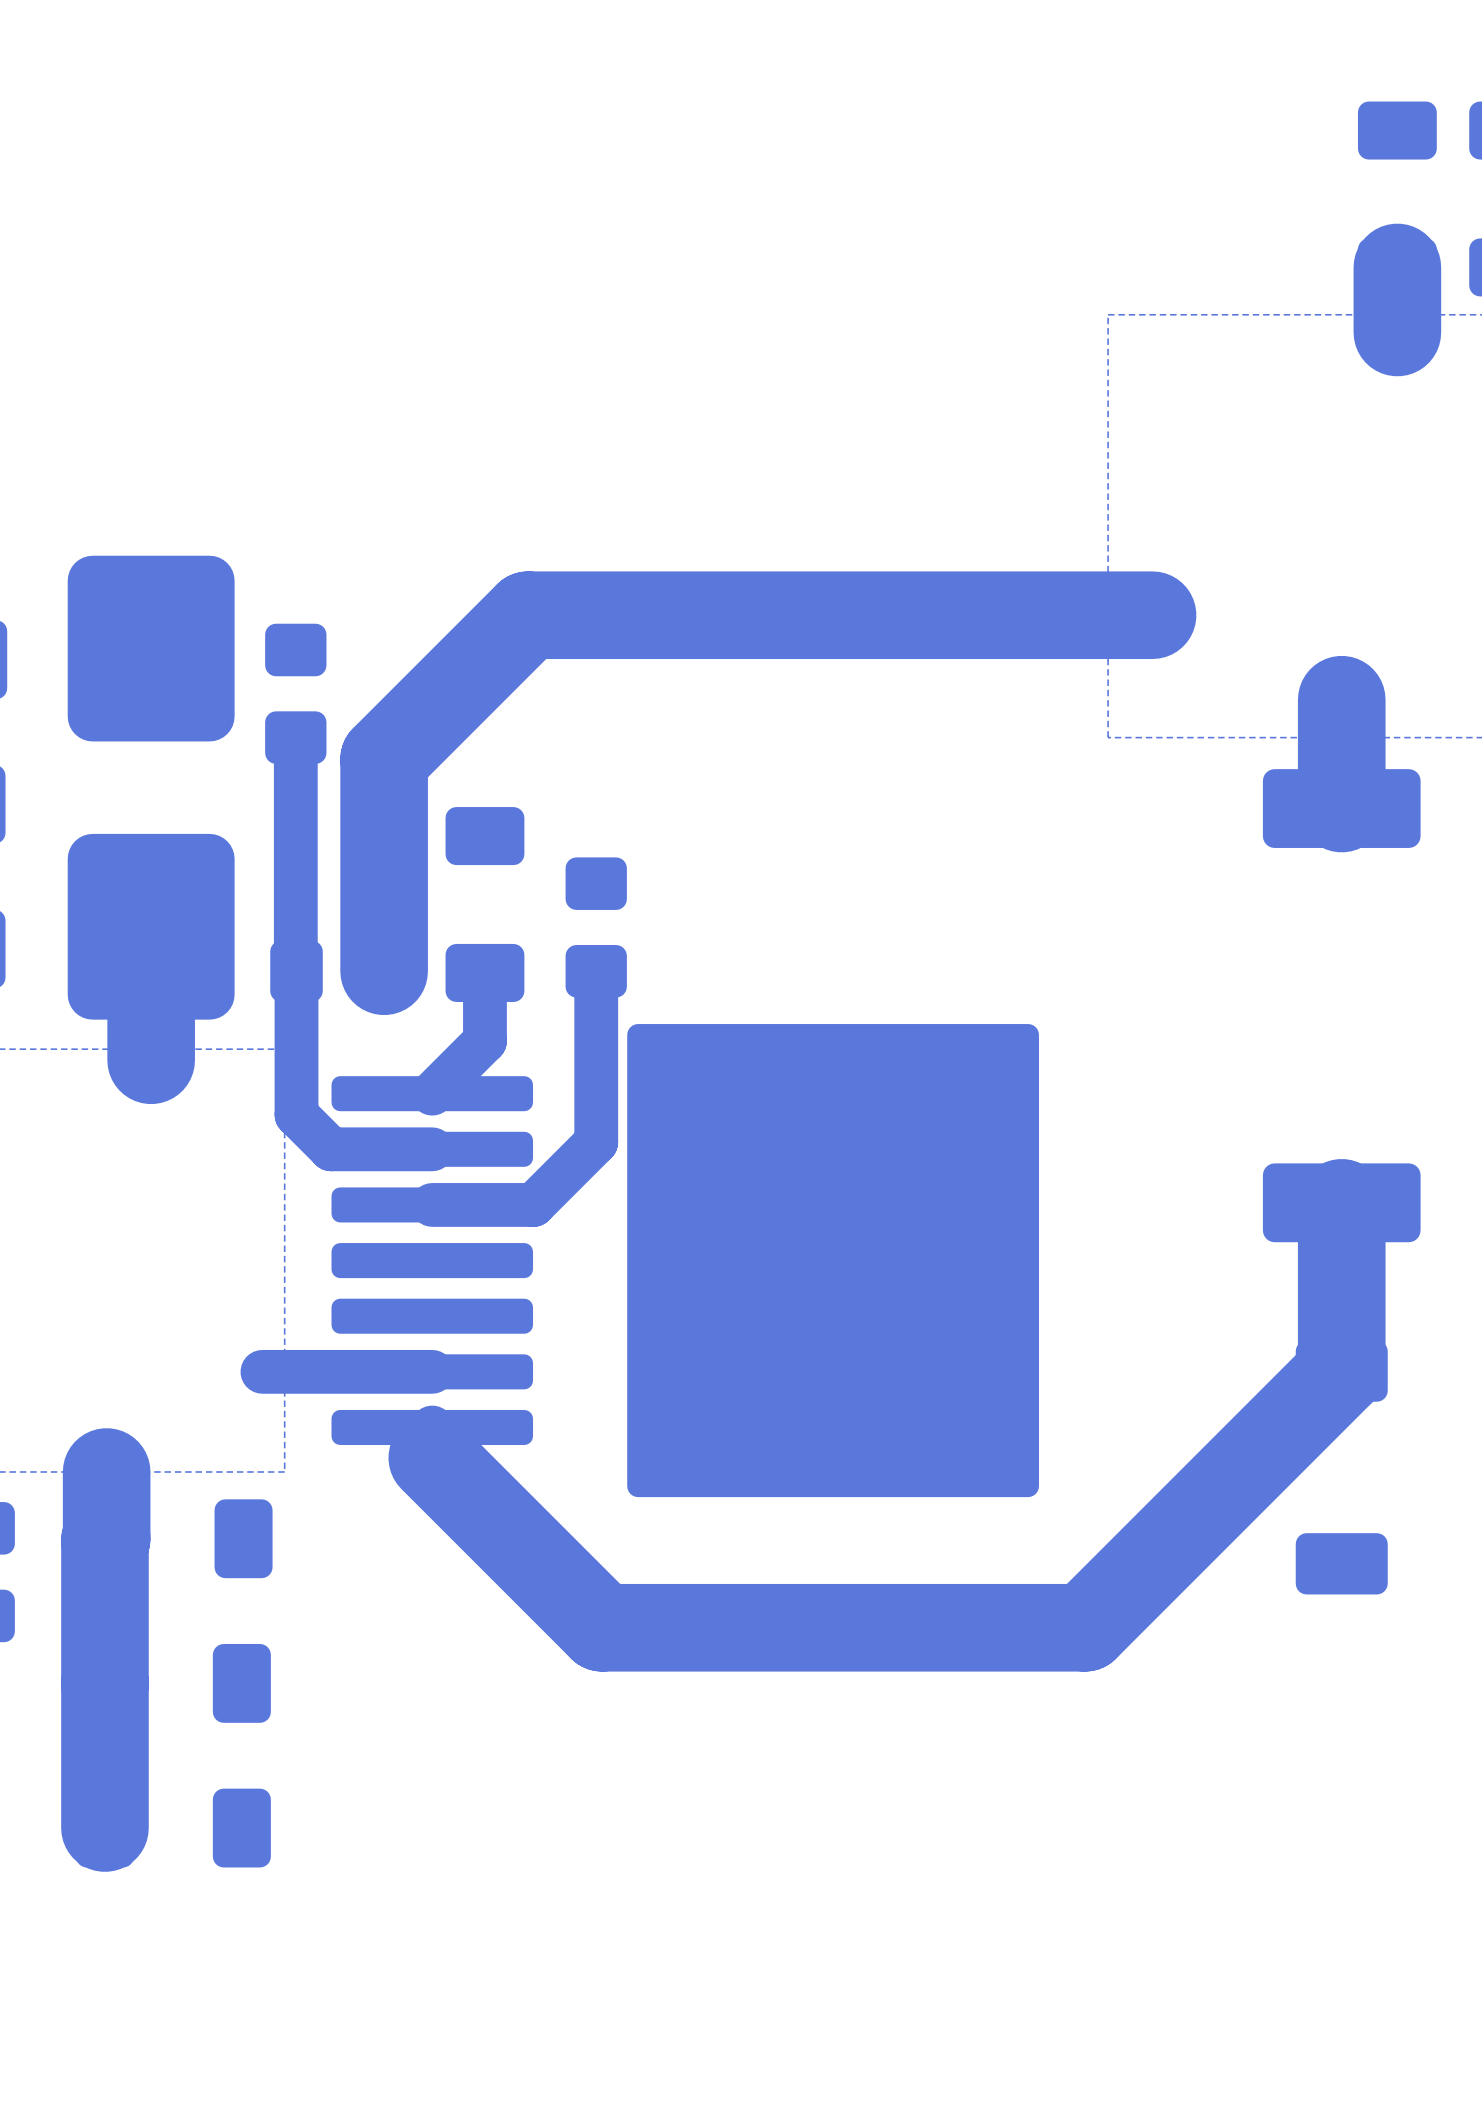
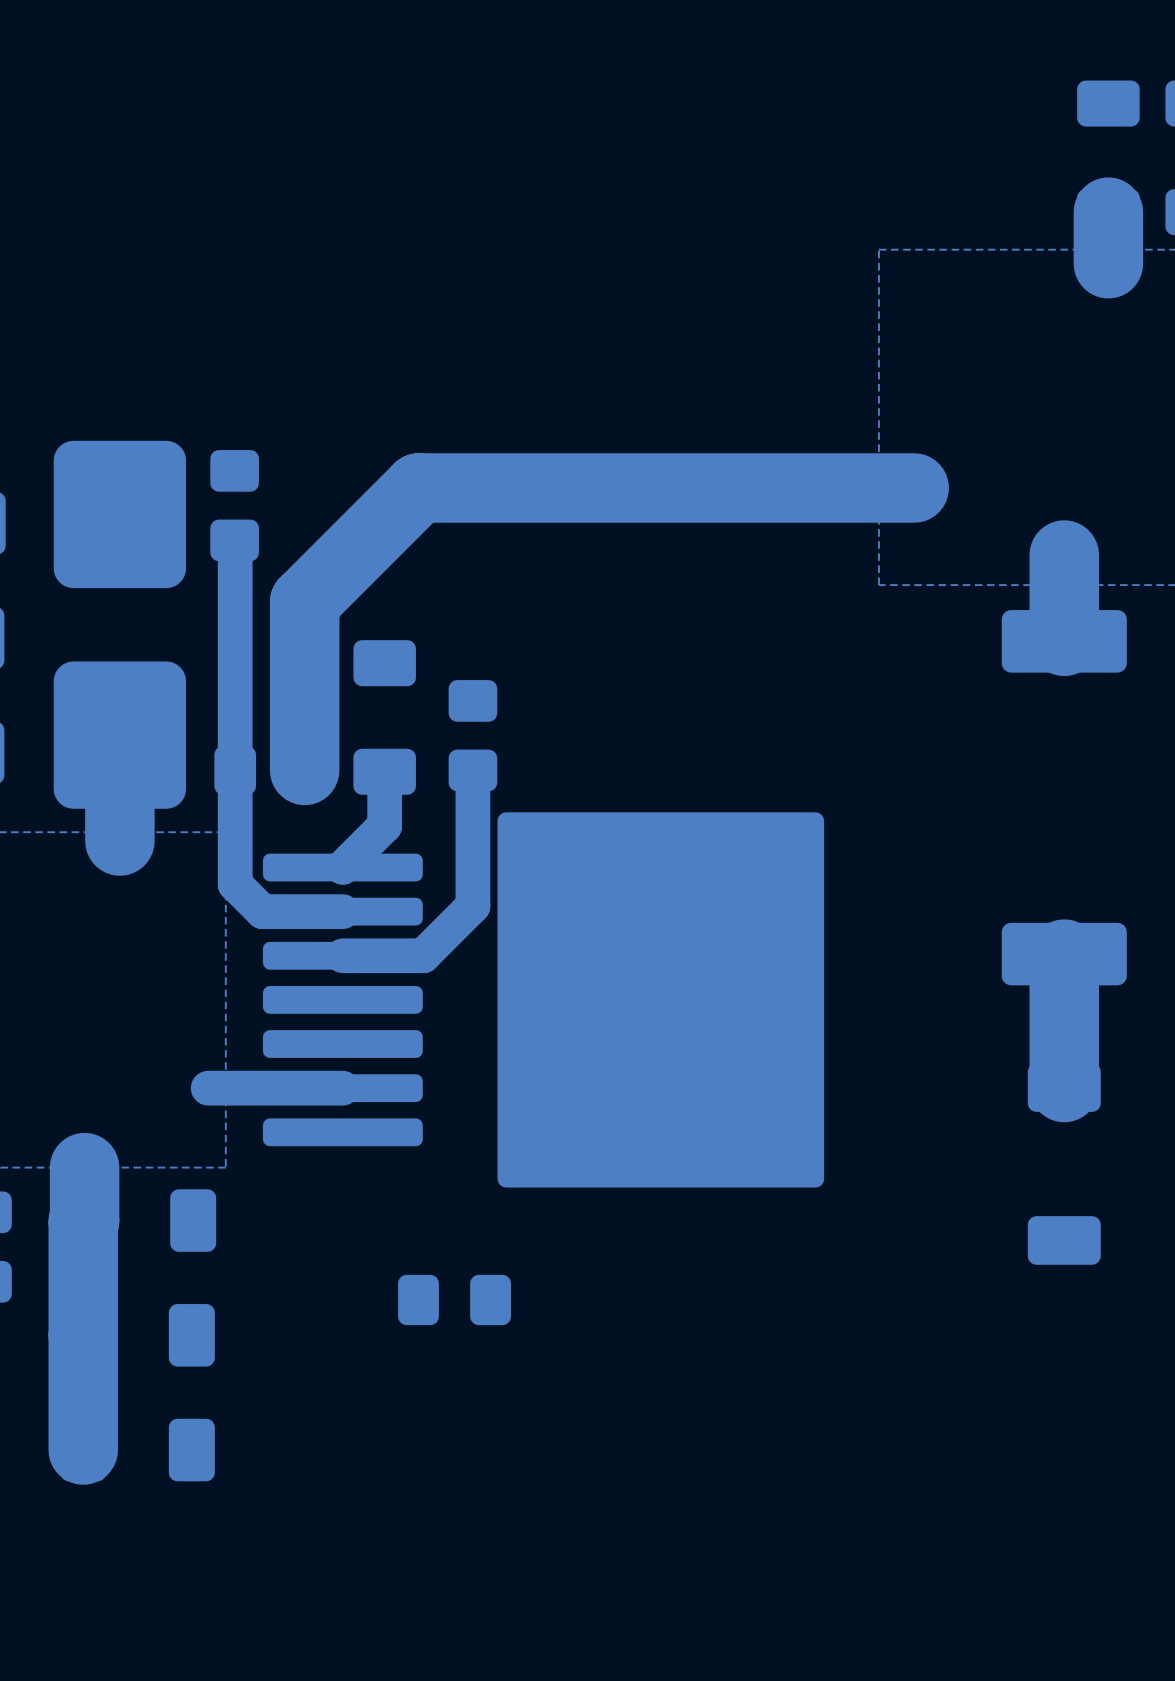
part position: (295, 693) -> (234, 505)
bottom track: (295, 737) (295, 970) -> (234, 540) (235, 770)
bottom track: (1341, 1371) (1085, 1627) (602, 1627) (432, 1457) (432, 1427) -> none
part: none -> (454, 1300)

